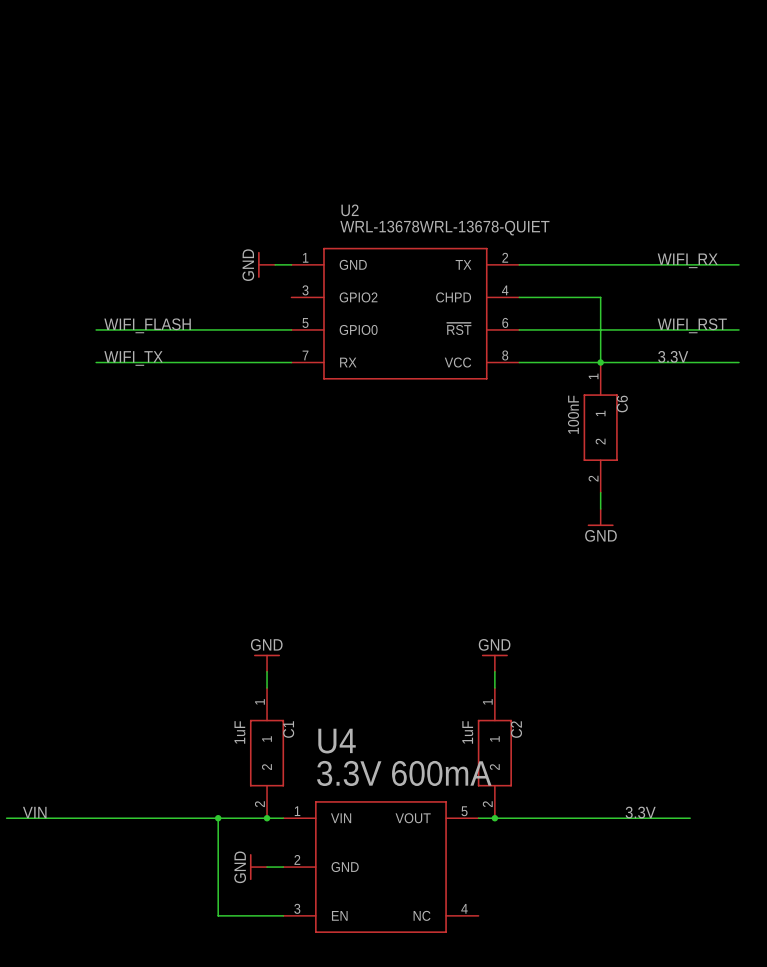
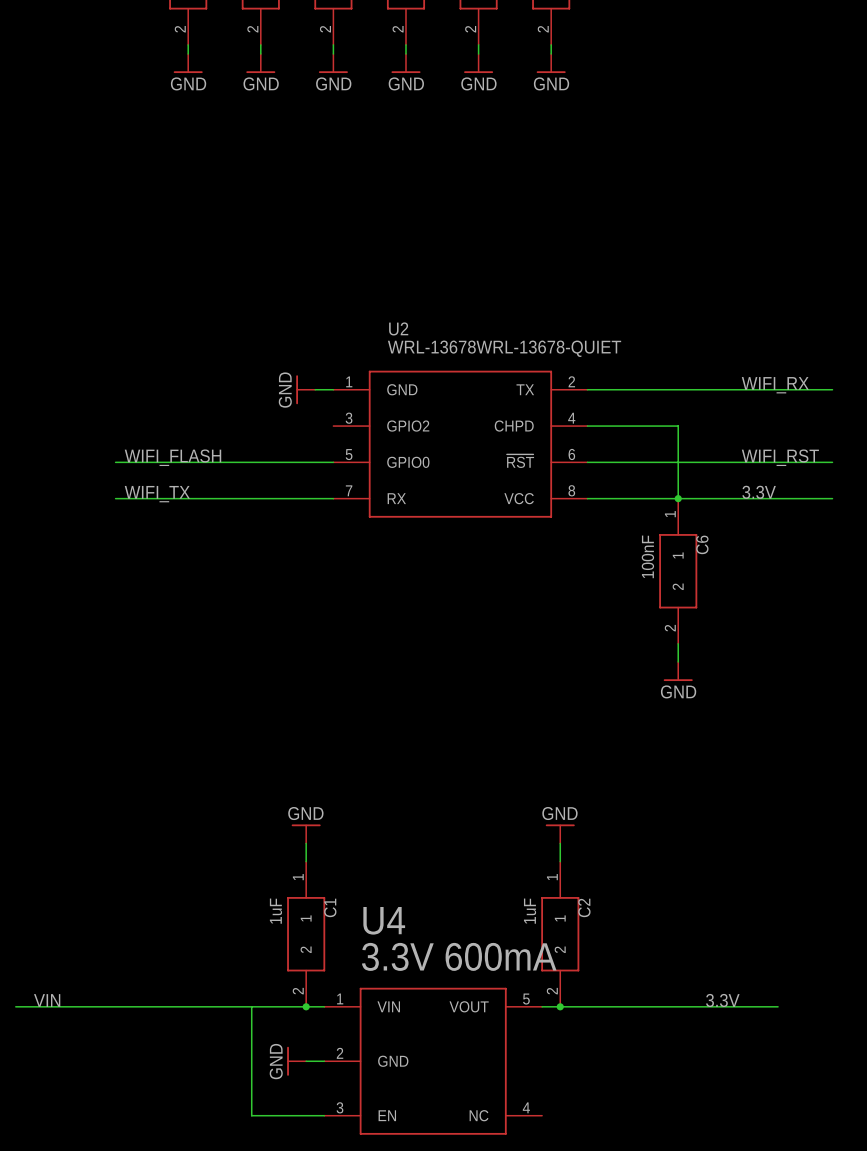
junction: (218, 818) -> none

